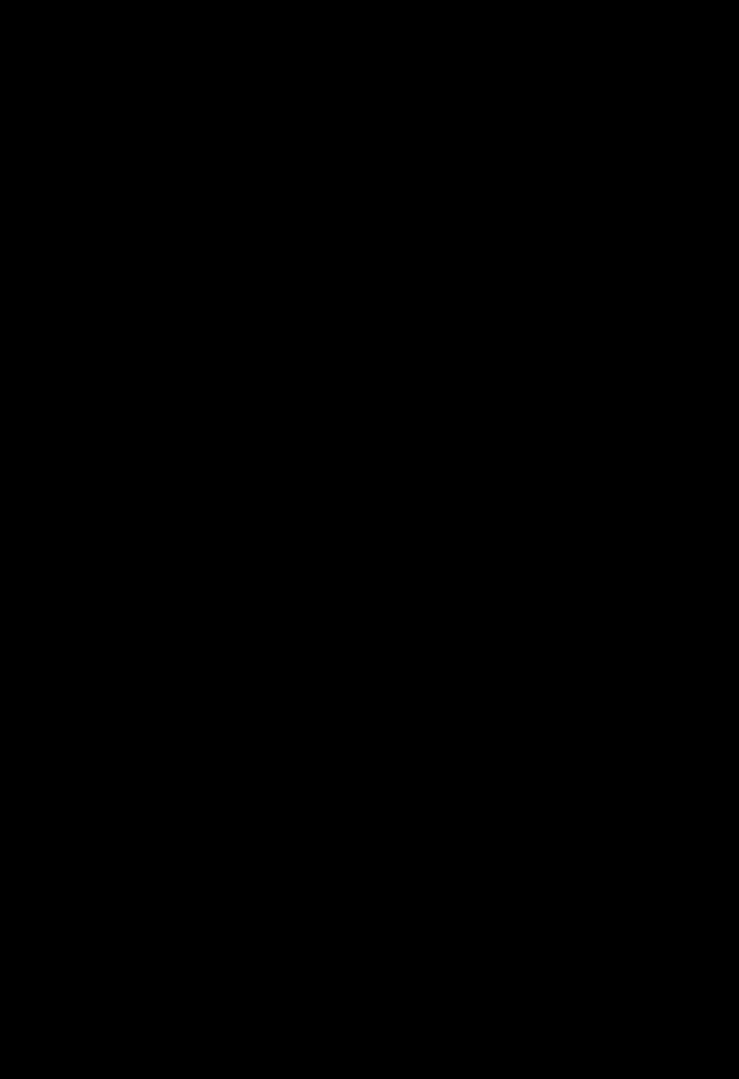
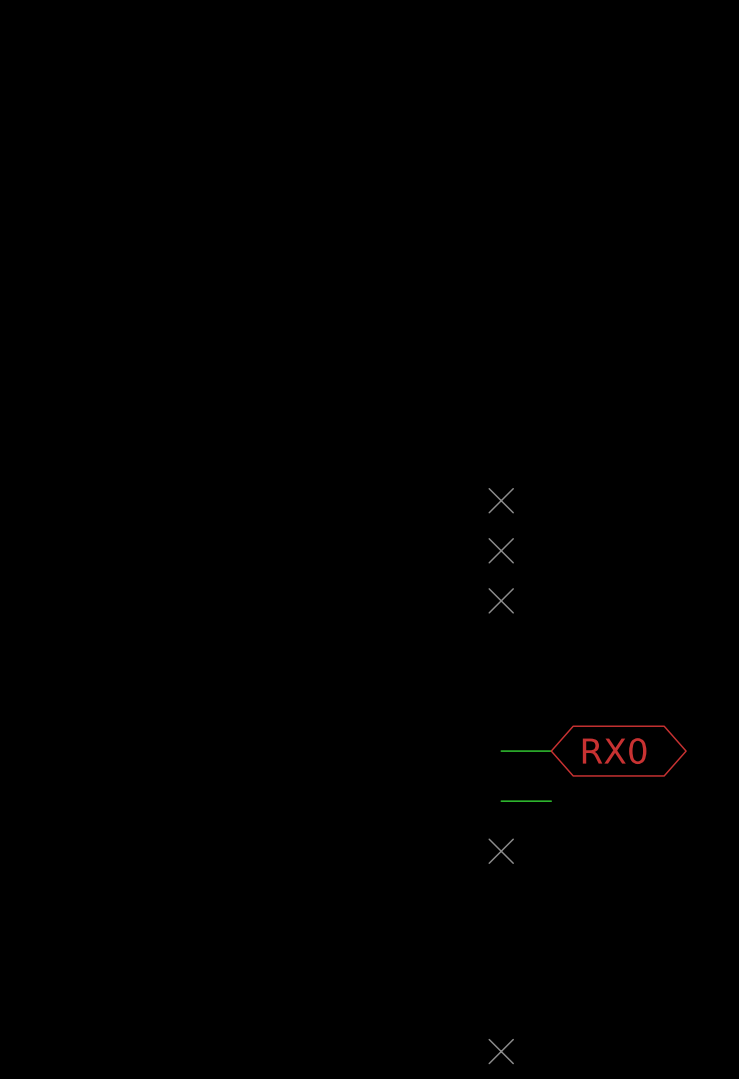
no-connect mark: none -> (501, 500)
no-connect mark: none -> (501, 550)
no-connect mark: none -> (501, 600)
wire: none -> (501, 751) (551, 751)
global label: none -> RX0 (614, 751)
wire: none -> (501, 801) (551, 801)
no-connect mark: none -> (501, 851)
no-connect mark: none -> (501, 1051)

